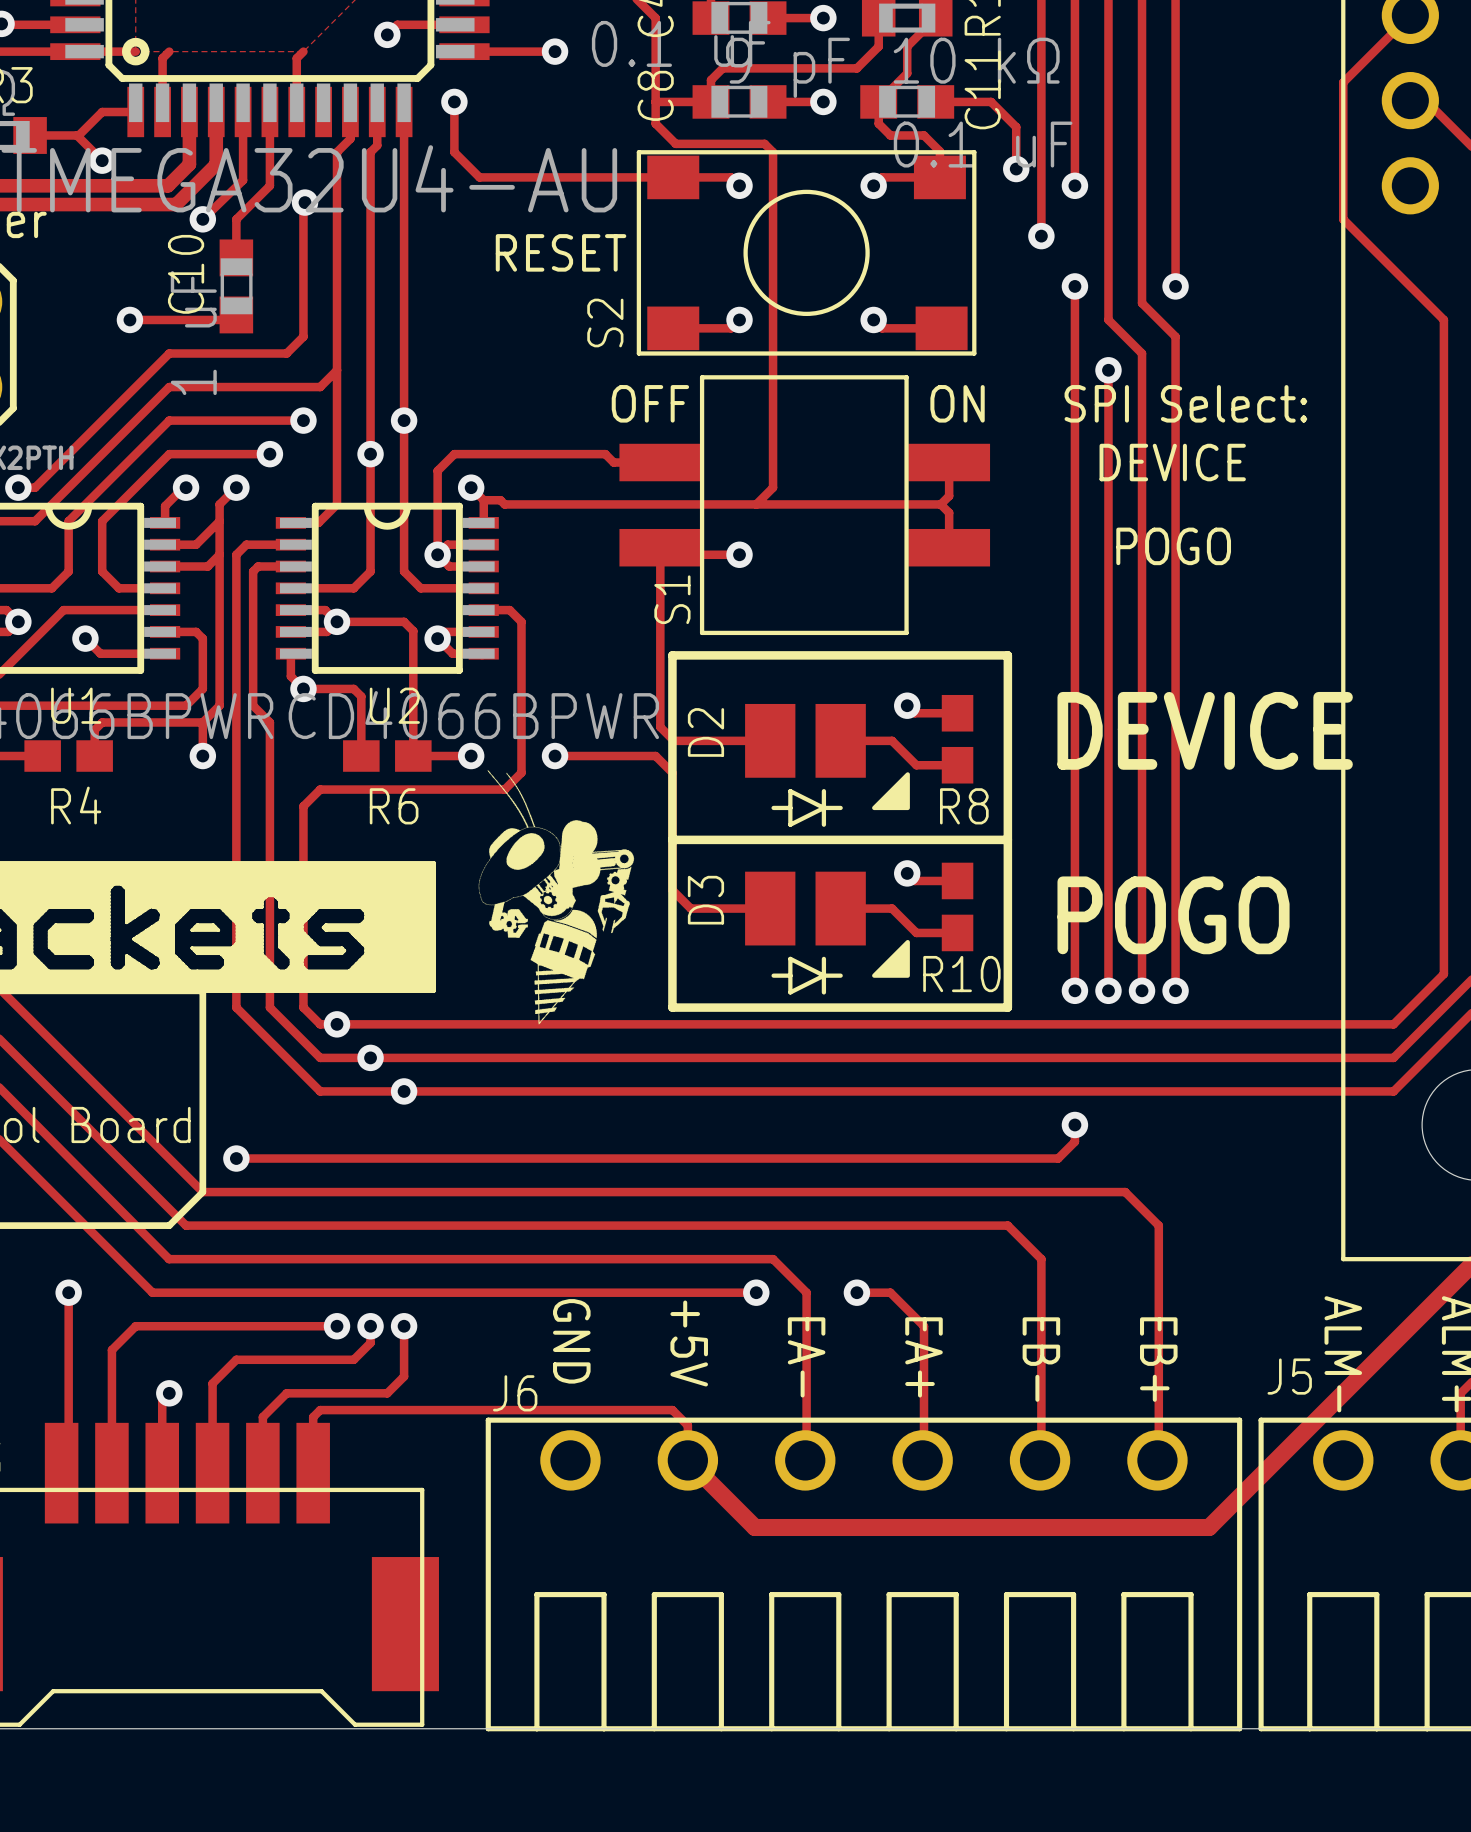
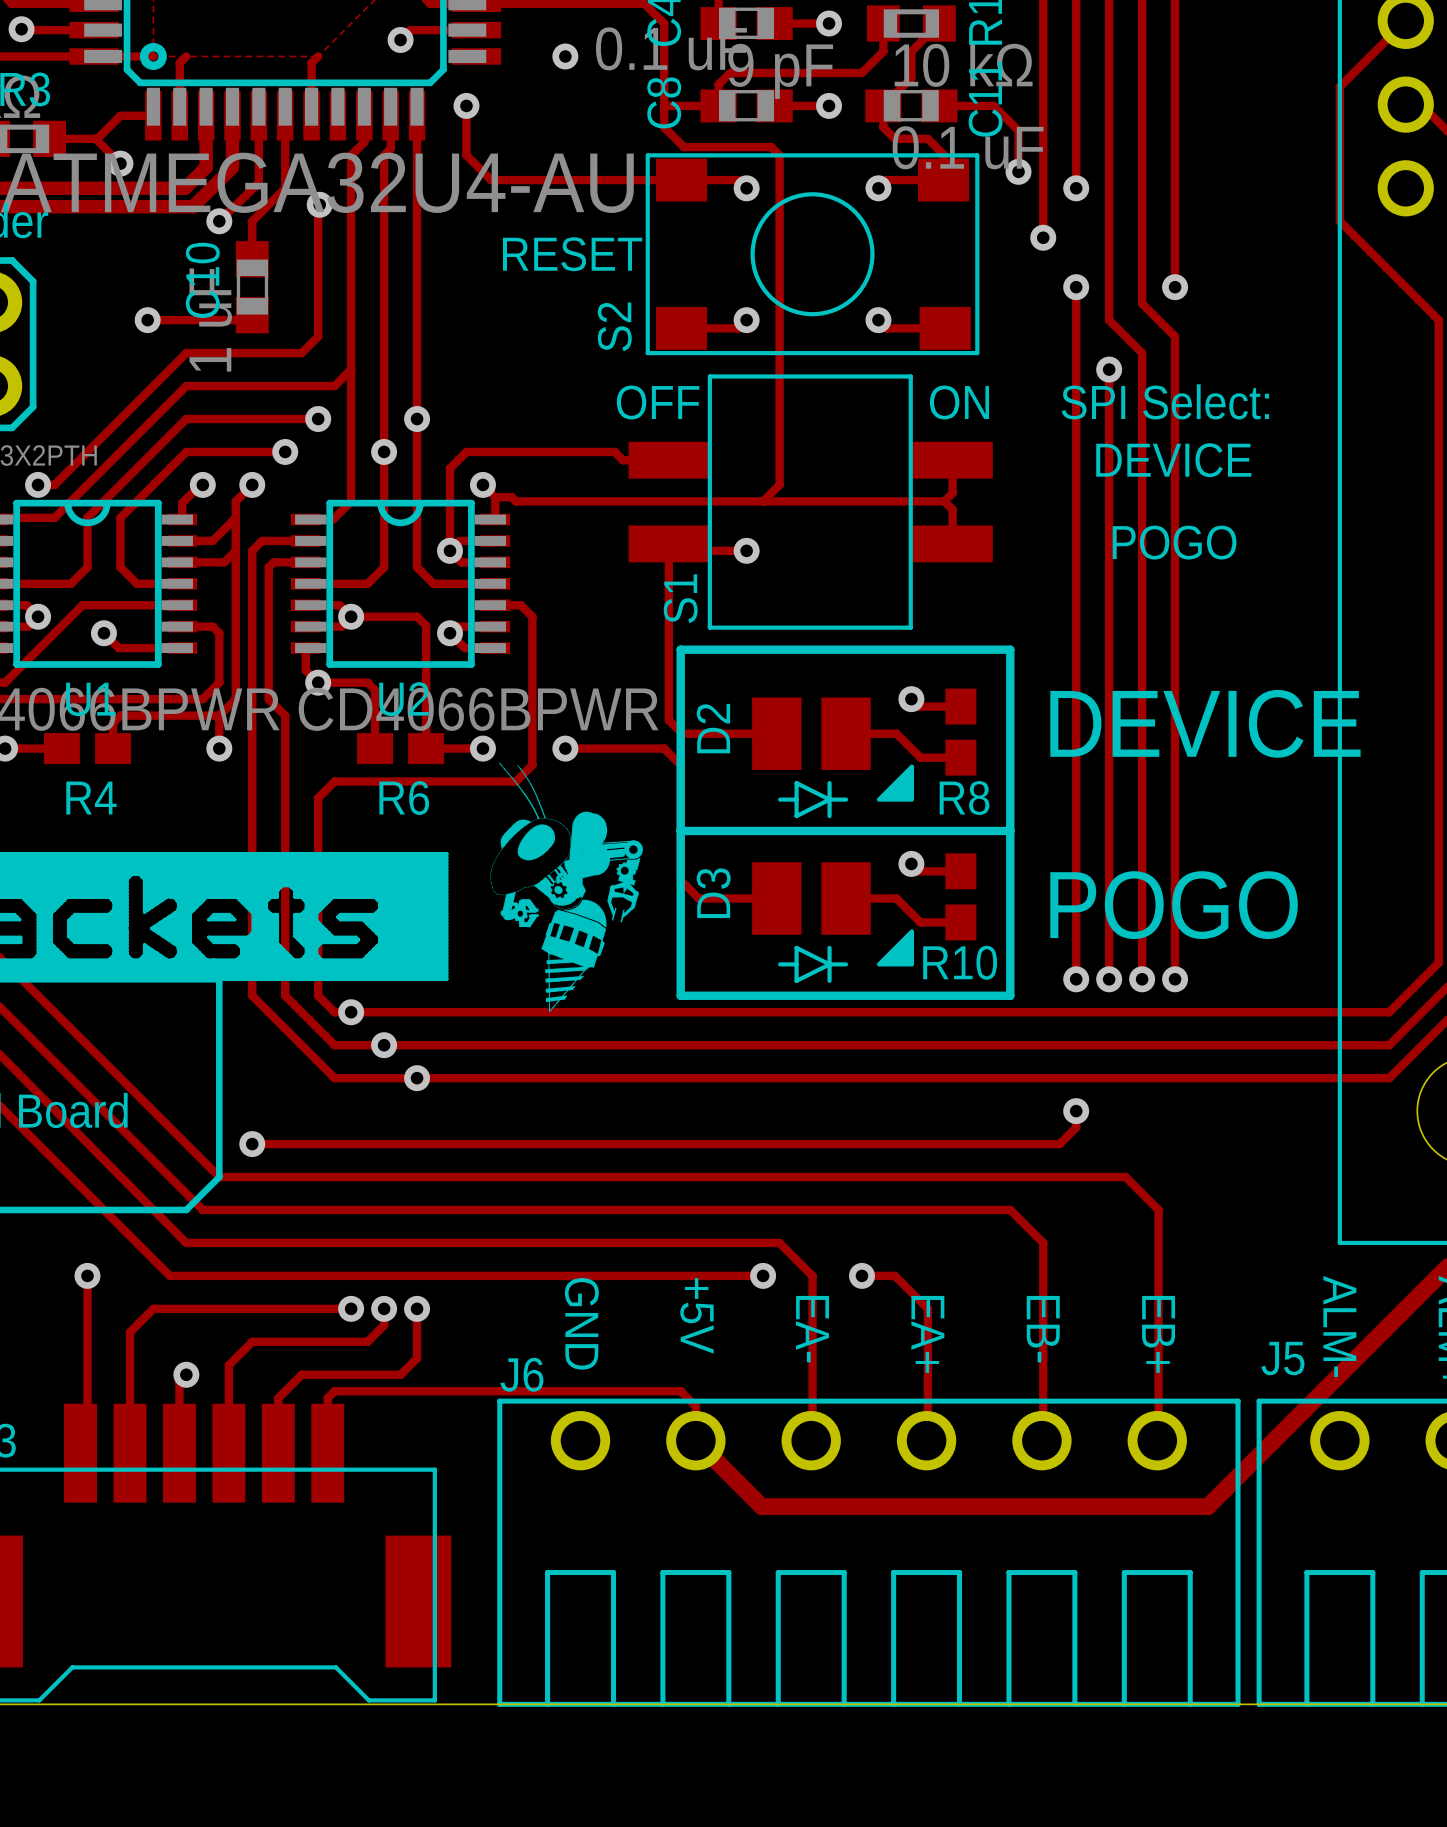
track: (464, 51) (555, 51) -> none

